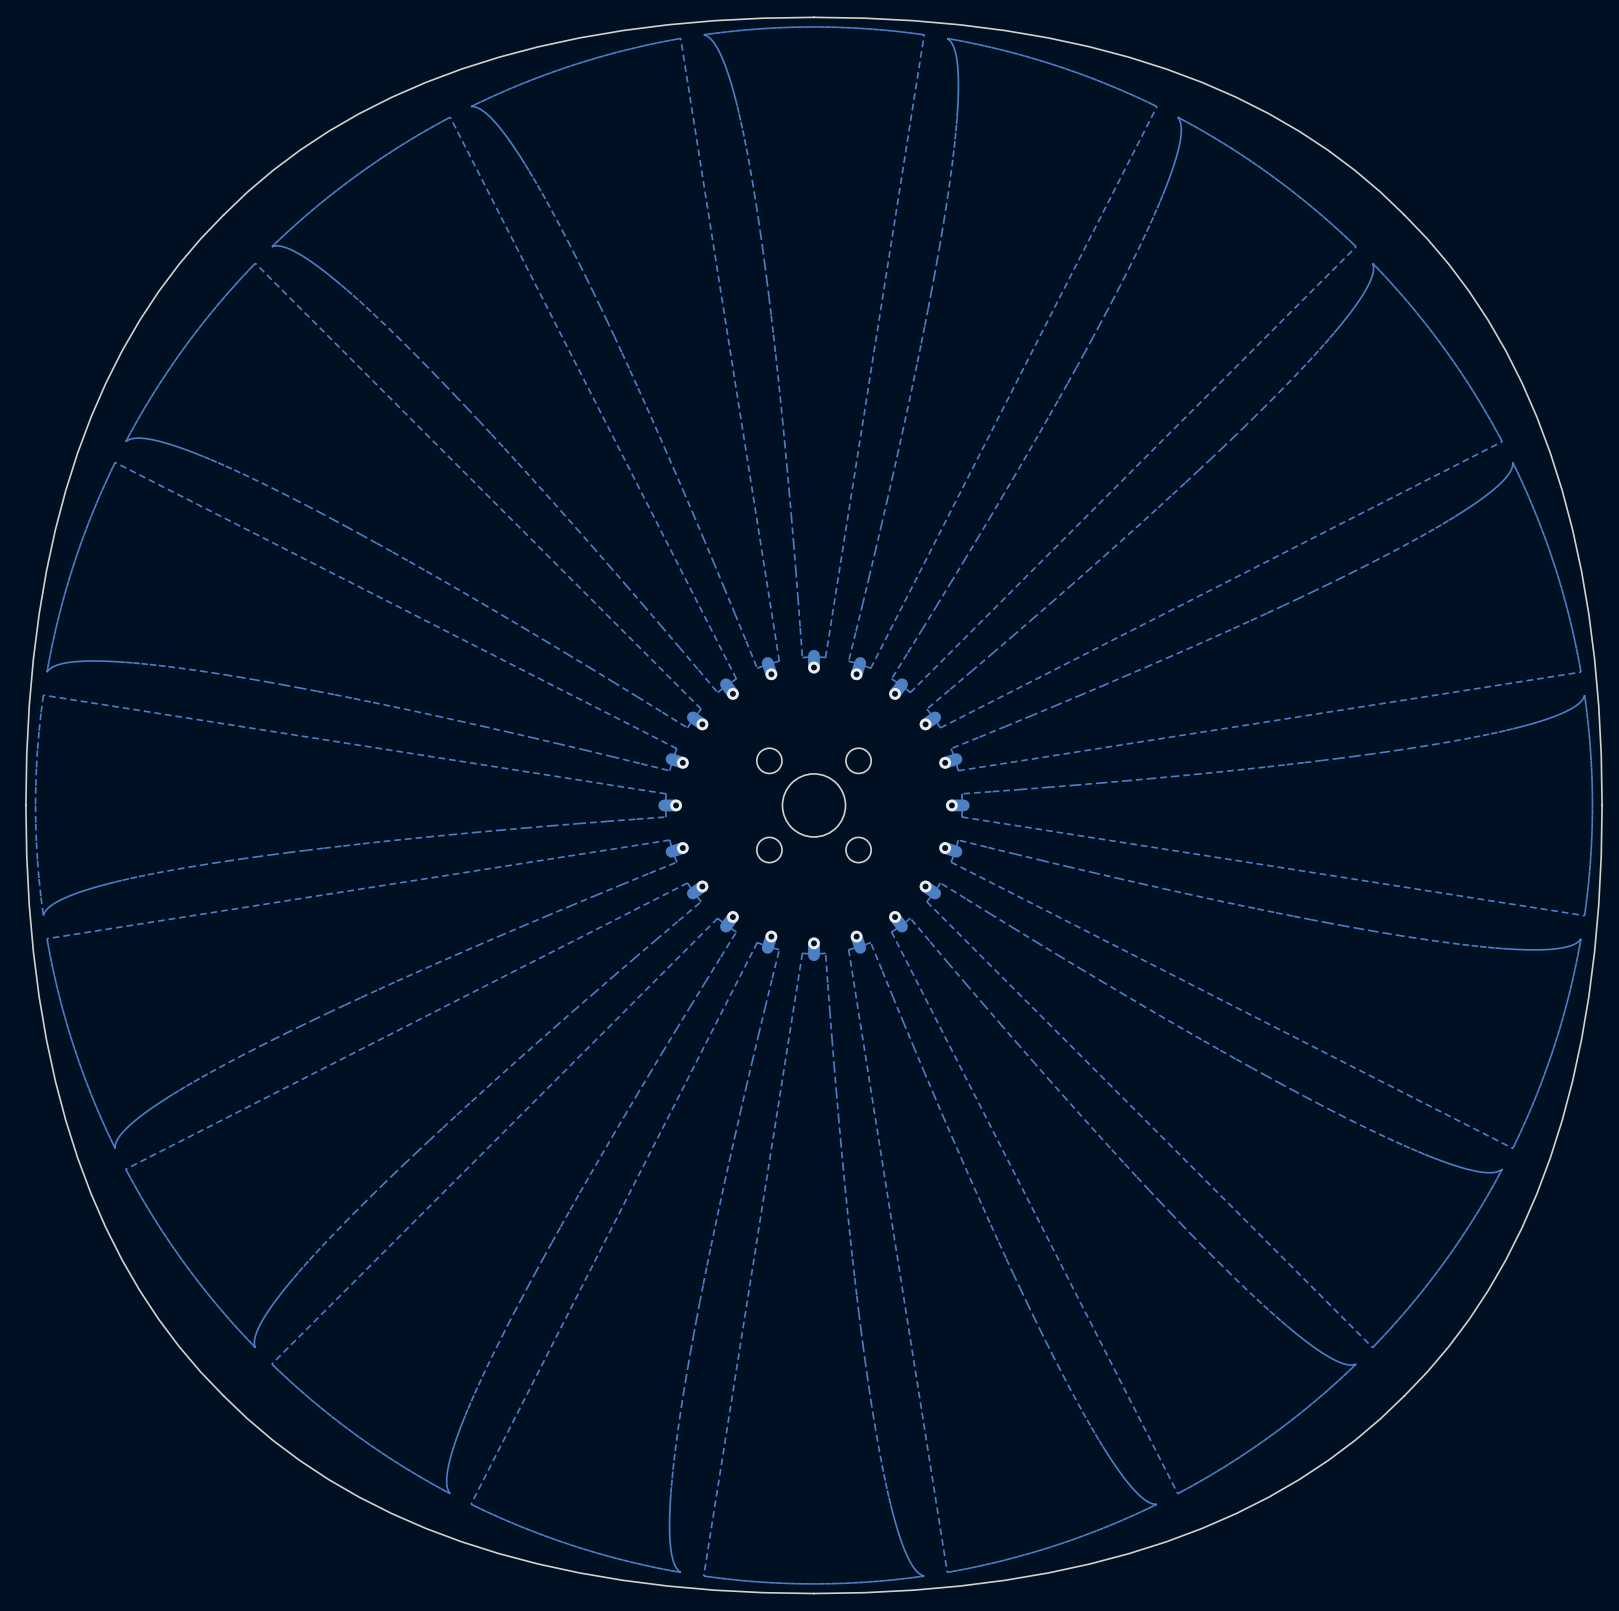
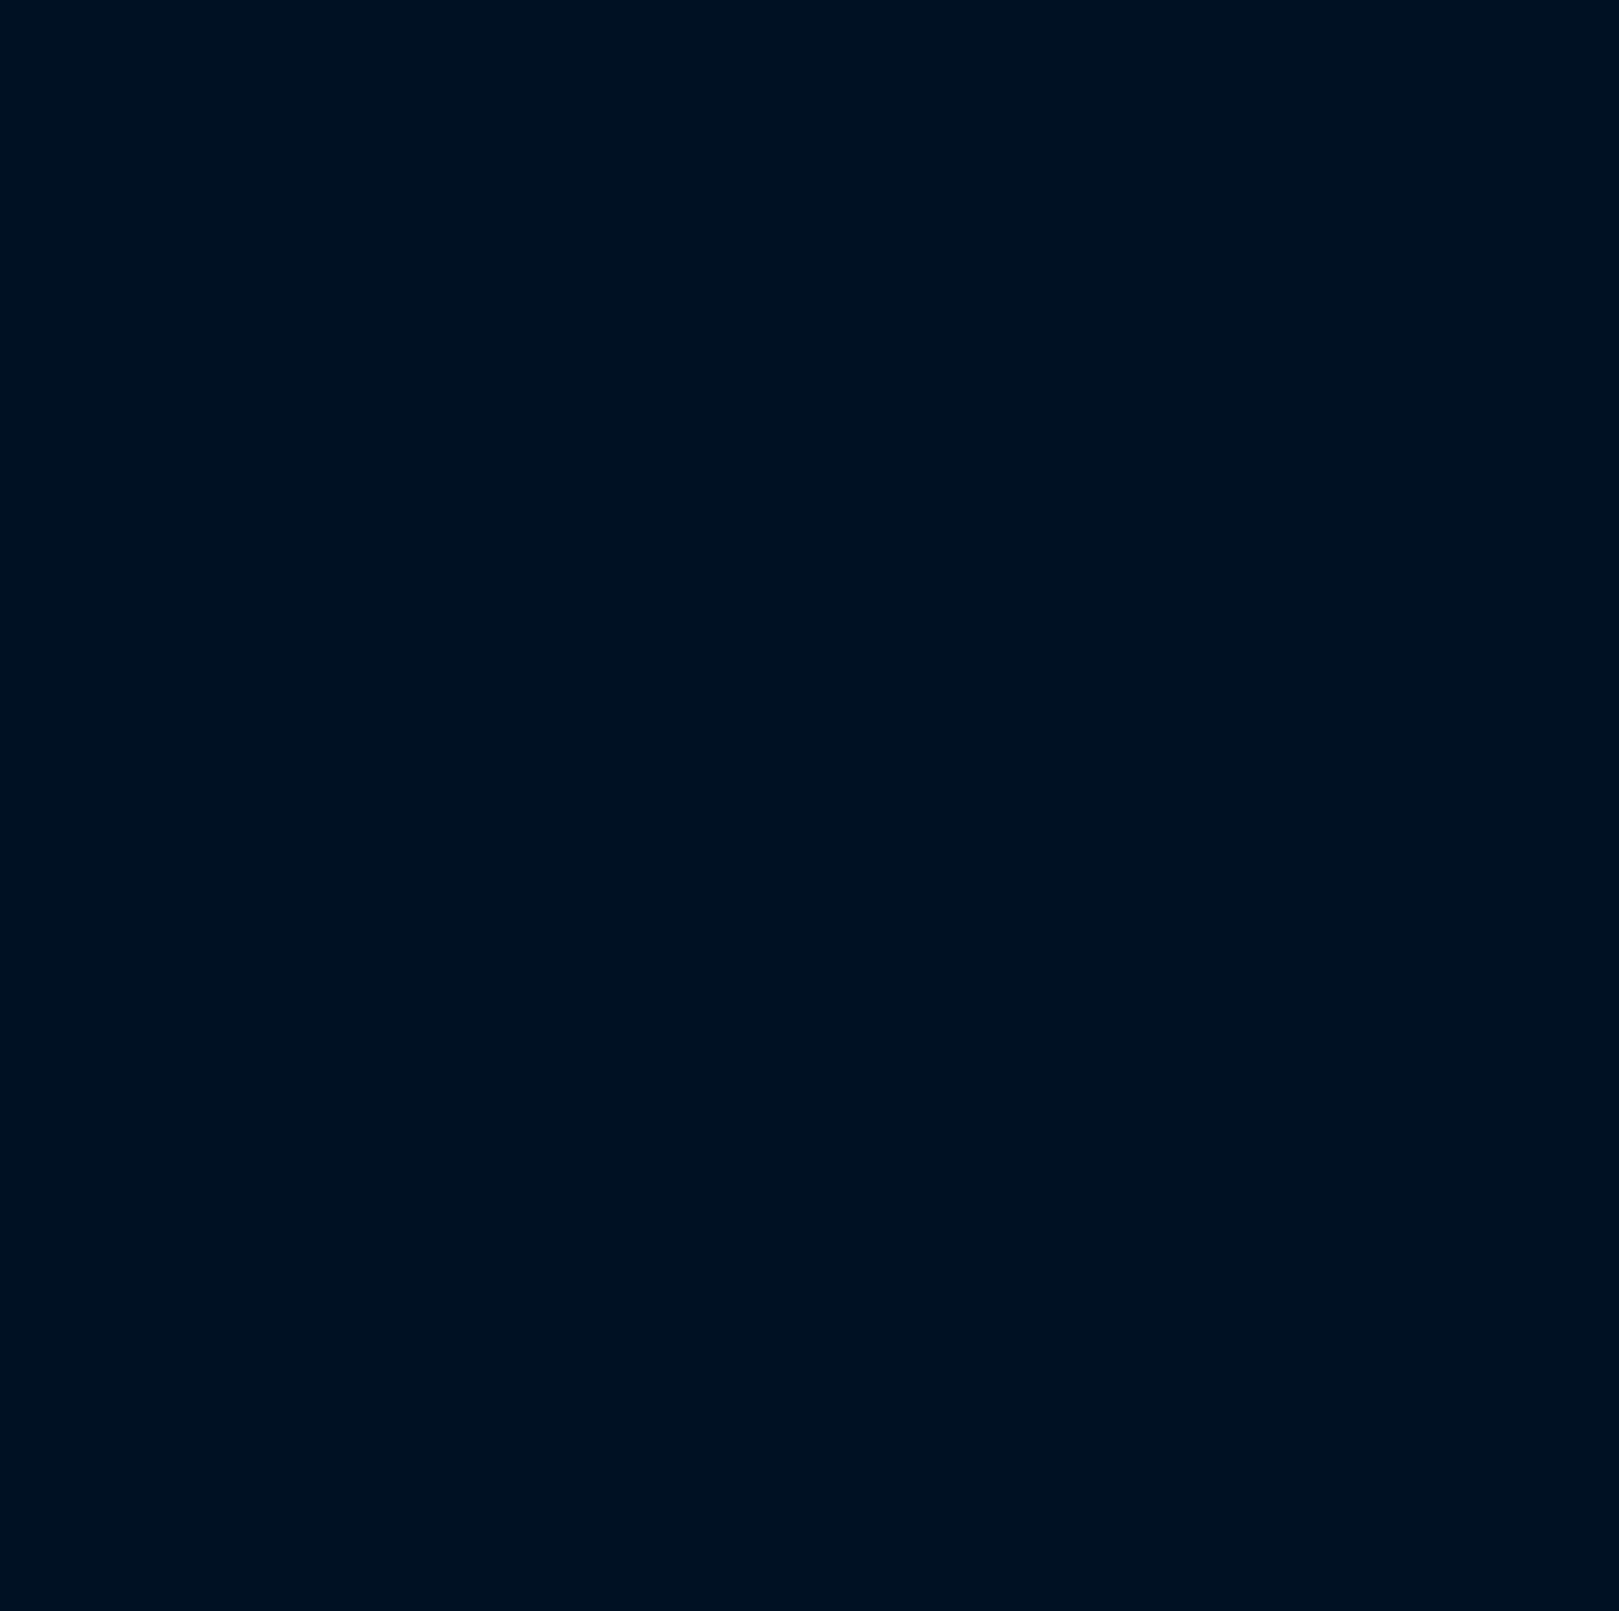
board edge: (813, 17) (913, 20) (1005, 30) (1089, 46) (1166, 69) (1236, 97) (1299, 131) (1355, 170) (1404, 215) (1448, 264) (1488, 320) (1522, 383) (1550, 452) (1572, 529) (1588, 614) (1598, 705) (1602, 805) (1598, 904) (1588, 996) (1572, 1081) (1550, 1158) (1522, 1227) (1488, 1290) (1448, 1346) (1404, 1395) (1355, 1440) (1299, 1479) (1236, 1513) (1166, 1541) (1089, 1564) (1005, 1580) (913, 1590) (813, 1593) (714, 1590) (622, 1580) (538, 1564) (461, 1541) (391, 1513) (328, 1479) (272, 1440) (223, 1395) (179, 1346) (139, 1290) (105, 1227) (77, 1158) (55, 1081) (39, 996) (29, 904) (25, 805) (29, 705) (39, 614) (55, 529) (77, 452) (105, 383) (139, 320) (179, 264) (223, 215) (272, 170) (328, 131) (391, 97) (461, 69) (538, 46) (622, 30) (714, 20) (813, 17) -> none
zone outline: (703, 34) (710, 38) (716, 47) (730, 82) (744, 139) (756, 205) (780, 396) (802, 657) (825, 657) (924, 34) (865, 28) (810, 26) (755, 29) (703, 34) -> none
zone outline: (947, 38) (1004, 50) (1057, 66) (1109, 85) (1156, 106) (870, 668) (848, 661) (908, 405) (944, 217) (953, 150) (958, 92) (955, 54) (952, 44) (947, 38) -> none
zone outline: (471, 106) (478, 108) (487, 114) (511, 143) (542, 193) (573, 252) (655, 426) (757, 668) (779, 661) (680, 38) (629, 49) (576, 64) (524, 82) (471, 106) -> none
zone outline: (1177, 117) (1222, 142) (1268, 173) (1312, 207) (1356, 246) (910, 692) (891, 678) (1027, 454) (1119, 286) (1149, 225) (1171, 171) (1181, 135) (1180, 124) (1177, 117) -> none
zone outline: (272, 246) (279, 246) (289, 249) (321, 269) (366, 307) (414, 354) (546, 494) (717, 692) (736, 678) (450, 117) (399, 146) (353, 177) (310, 211) (271, 246) -> none
zone outline: (1372, 263) (1411, 306) (1445, 350) (1476, 396) (1502, 441) (940, 727) (926, 709) (1125, 537) (1265, 406) (1312, 357) (1350, 313) (1370, 281) (1373, 270) (1372, 263) -> none
zone outline: (125, 441) (132, 438) (143, 438) (180, 447) (234, 469) (294, 499) (463, 592) (687, 727) (701, 709) (255, 263) (220, 301) (186, 345) (155, 390) (125, 441) -> none
zone outline: (1512, 462) (1534, 509) (1553, 561) (1568, 614) (1580, 672) (958, 770) (951, 748) (1192, 646) (1366, 565) (1426, 533) (1475, 502) (1504, 478) (1511, 469) (1512, 462) -> none
track: (813, 655) (813, 667) -> none
track: (767, 663) (771, 674) -> none
track: (860, 663) (856, 674) -> none
via: (813, 667) -> none
zone outline: (47, 672) (52, 667) (63, 663) (100, 661) (158, 665) (225, 674) (414, 711) (669, 770) (676, 748) (115, 462) (91, 516) (72, 568) (57, 621) (47, 672) -> none
via: (771, 674) -> none
via: (856, 674) -> none
track: (725, 684) (732, 693) -> none
track: (902, 684) (895, 693) -> none
via: (732, 693) -> none
via: (895, 693) -> none
zone outline: (1584, 695) (1590, 746) (1592, 801) (1590, 857) (1584, 915) (961, 817) (961, 793) (1223, 771) (1413, 747) (1480, 736) (1537, 722) (1571, 708) (1580, 701) (1584, 695) -> none
track: (692, 717) (702, 724) -> none
track: (935, 717) (925, 724) -> none
via: (702, 724) -> none
via: (925, 724) -> none
round board edge: [756, 748, 783, 774] -> none
round board edge: [845, 748, 872, 774] -> none
track: (671, 759) (682, 762) -> none
track: (956, 759) (945, 762) -> none
via: (682, 762) -> none
via: (945, 762) -> none
round board edge: [782, 773, 846, 838] -> none
track: (676, 805) (664, 805) -> none
via: (676, 805) -> none
via: (951, 805) -> none
track: (963, 805) (951, 805) -> none
round board edge: [756, 837, 783, 863] -> none
round board edge: [845, 837, 872, 863] -> none
track: (682, 848) (671, 851) -> none
via: (682, 848) -> none
track: (945, 848) (956, 851) -> none
via: (945, 848) -> none
track: (702, 886) (692, 893) -> none
via: (702, 886) -> none
track: (925, 886) (935, 893) -> none
via: (925, 886) -> none
zone outline: (43, 915) (47, 909) (56, 902) (90, 888) (147, 874) (214, 863) (404, 839) (666, 817) (666, 793) (43, 695) (37, 750) (35, 805) (37, 860) (43, 915) -> none
track: (732, 917) (725, 926) -> none
via: (732, 917) -> none
track: (895, 917) (902, 926) -> none
via: (895, 917) -> none
track: (771, 936) (767, 947) -> none
via: (771, 936) -> none
track: (856, 936) (860, 947) -> none
via: (856, 936) -> none
zone outline: (1580, 938) (1570, 989) (1555, 1042) (1536, 1094) (1512, 1148) (951, 862) (958, 840) (1213, 899) (1402, 935) (1469, 945) (1527, 949) (1564, 947) (1575, 943) (1580, 938) -> none
track: (813, 943) (813, 955) -> none
via: (813, 943) -> none
zone outline: (115, 1148) (116, 1140) (123, 1131) (152, 1107) (201, 1077) (261, 1045) (435, 964) (676, 862) (669, 840) (47, 938) (59, 996) (74, 1049) (93, 1101) (115, 1148) -> none
zone outline: (1502, 1169) (1472, 1220) (1441, 1265) (1407, 1309) (1372, 1347) (926, 901) (940, 882) (1164, 1018) (1333, 1111) (1393, 1140) (1447, 1163) (1484, 1172) (1495, 1172) (1502, 1169) -> none
zone outline: (255, 1347) (254, 1340) (257, 1329) (277, 1297) (315, 1253) (362, 1204) (502, 1073) (701, 901) (687, 882) (125, 1169) (155, 1220) (186, 1265) (220, 1309) (255, 1347) -> none
zone outline: (1356, 1364) (1317, 1398) (1274, 1433) (1228, 1464) (1177, 1493) (891, 931) (910, 918) (1081, 1116) (1213, 1256) (1261, 1303) (1306, 1341) (1338, 1361) (1348, 1364) (1355, 1364) -> none
zone outline: (450, 1493) (447, 1486) (446, 1475) (456, 1439) (478, 1385) (508, 1324) (600, 1156) (736, 931) (717, 918) (271, 1364) (315, 1403) (359, 1437) (405, 1467) (450, 1493) -> none
zone outline: (1156, 1504) (1103, 1528) (1051, 1546) (998, 1561) (947, 1572) (848, 949) (870, 942) (972, 1184) (1054, 1358) (1085, 1417) (1116, 1467) (1140, 1496) (1149, 1502) (1156, 1504) -> none
zone outline: (680, 1572) (675, 1566) (672, 1556) (669, 1518) (674, 1460) (683, 1393) (719, 1204) (779, 949) (757, 942) (471, 1504) (518, 1525) (570, 1544) (623, 1560) (680, 1572) -> none
zone outline: (924, 1576) (872, 1581) (817, 1583) (762, 1582) (703, 1576) (802, 953) (825, 953) (847, 1214) (871, 1405) (883, 1471) (897, 1528) (911, 1563) (917, 1572) (924, 1576) -> none

